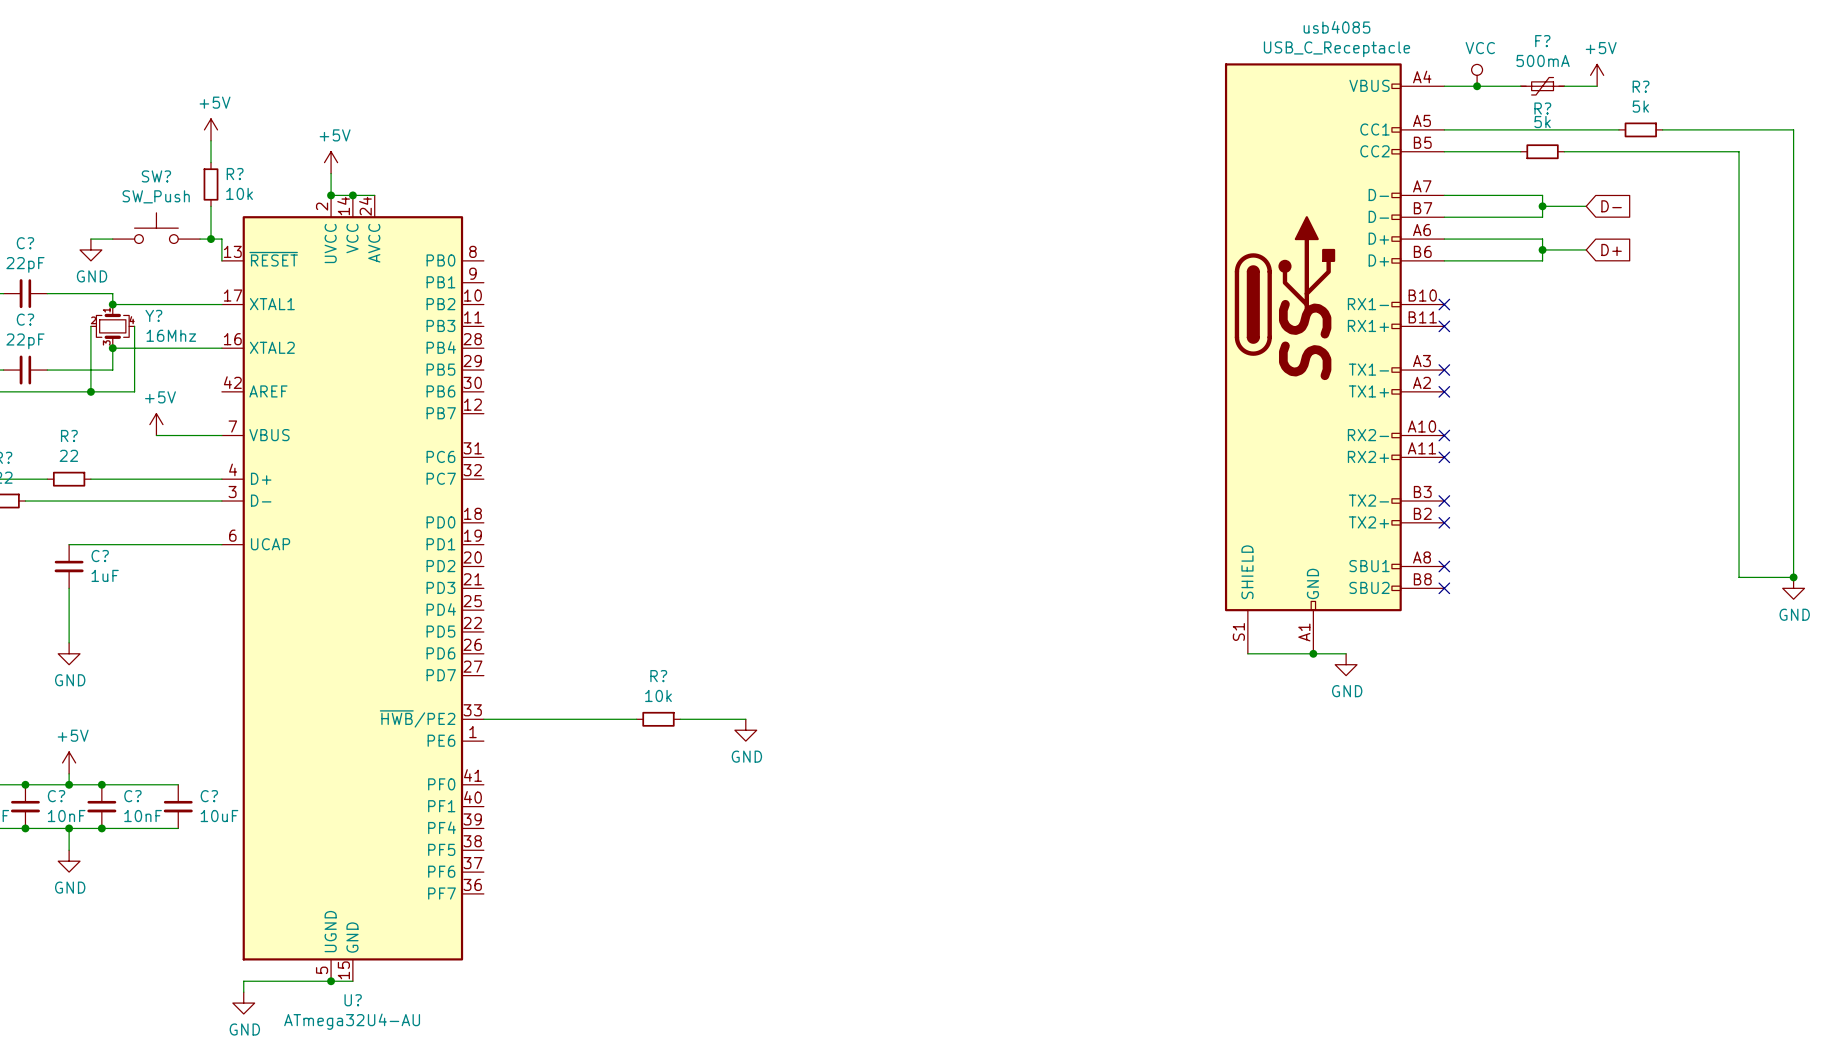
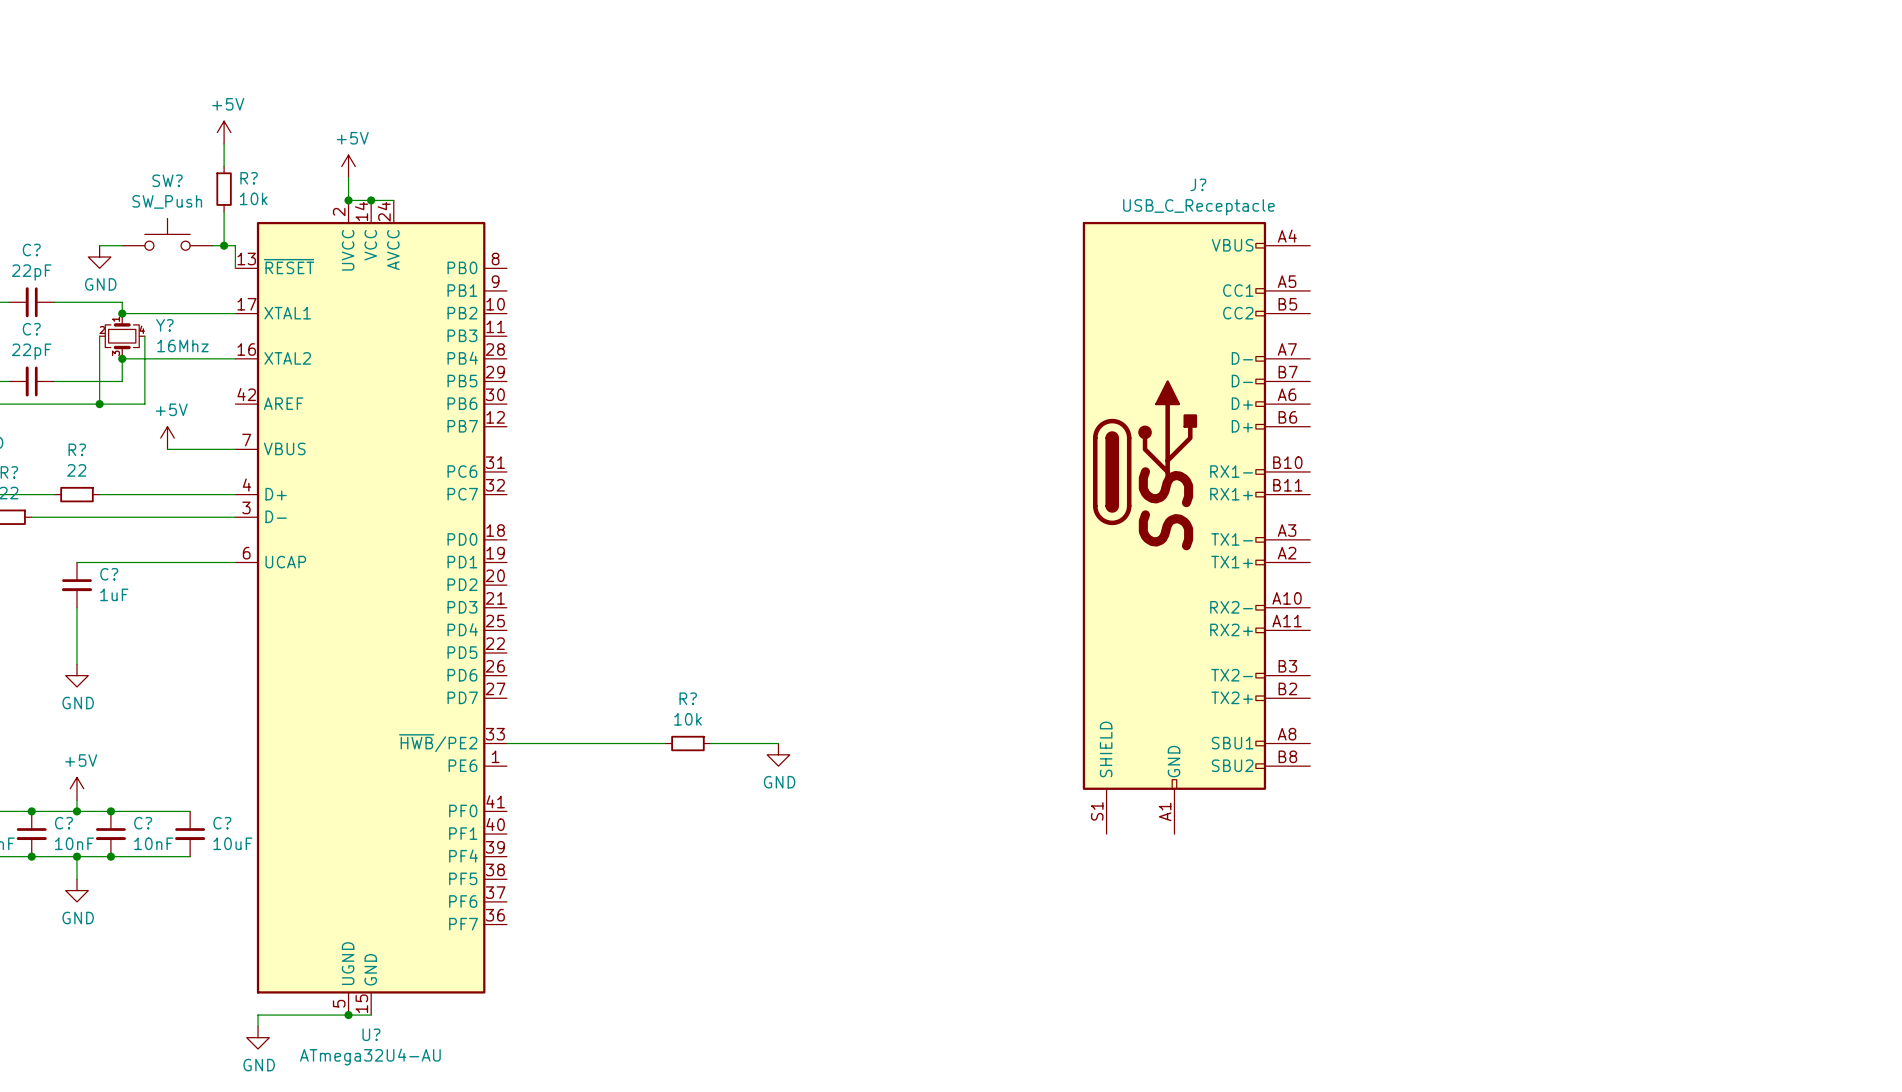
power symbol: VCC (1477, 75) -> none
power symbol: +5V (1597, 75) -> none
wire: (1444, 86) (1520, 86) -> none
junction: (1477, 86) -> none
F?: 500mA (1542, 86) -> none
wire: (1564, 86) (1597, 86) -> none
wire: (1444, 129) (1618, 129) -> none
R?: 5k (1640, 129) -> none
wire: (1662, 129) (1793, 129) (1793, 577) (1739, 577) (1739, 151) (1564, 151) -> none
wire: (1444, 151) (1520, 151) -> none
R?: 5k (1542, 151) -> none
wire: (1444, 195) (1542, 195) (1542, 217) (1444, 217) -> none
wire: (1542, 206) (1586, 206) -> none
junction: (1542, 206) -> none
global label: D- (1611, 206) -> none
wire: (1444, 239) (1542, 239) (1542, 260) (1444, 260) -> none
wire: (1542, 249) (1586, 249) -> none
junction: (1542, 249) -> none
global label: D+ (1611, 249) -> none
no-connect mark: (1444, 304) -> none
no-connect mark: (1444, 326) -> none
usb4085: USB_C_Receptacle (1334, 358) -> none
no-connect mark: (1444, 370) -> none
no-connect mark: (1444, 391) -> none
no-connect mark: (1444, 435) -> none
no-connect mark: (1444, 457) -> none
no-connect mark: (1444, 501) -> none
J?: none -> USB_C_Receptacle (1196, 527)
no-connect mark: (1444, 522) -> none
no-connect mark: (1444, 566) -> none
junction: (1793, 577) -> none
no-connect mark: (1444, 588) -> none
power symbol: GND (1793, 588) -> none
wire: (1247, 653) (1346, 653) -> none
junction: (1313, 653) -> none
power symbol: GND (1346, 664) -> none

